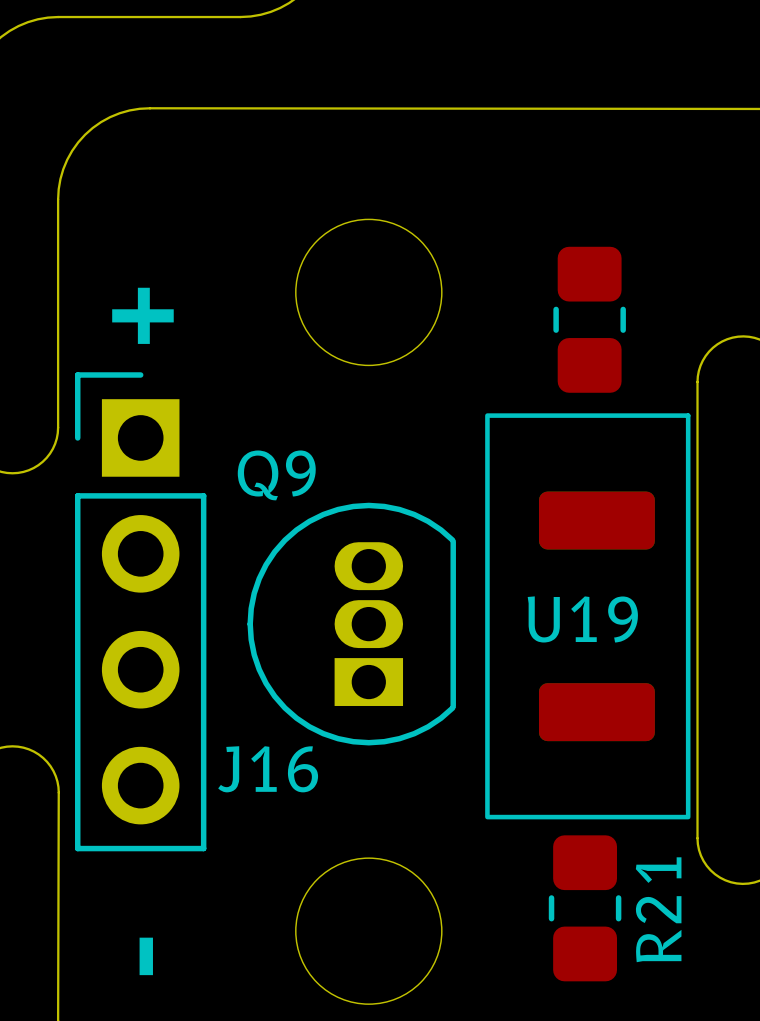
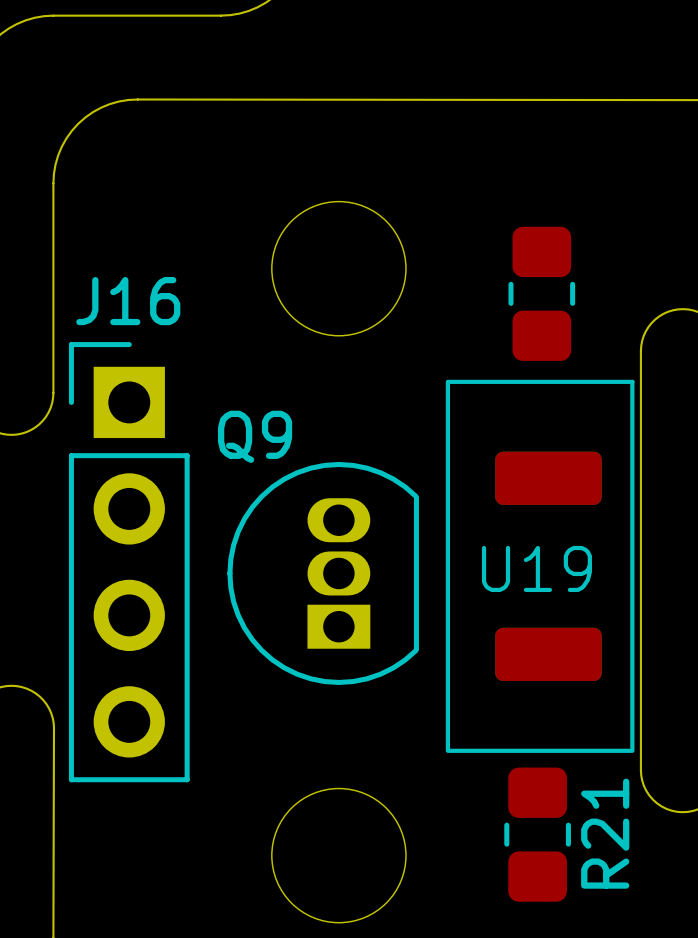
text: + (142, 315) -> none
J16 name position: J16 (268, 769) -> J16 (128, 301)
text: - (146, 956) -> none

